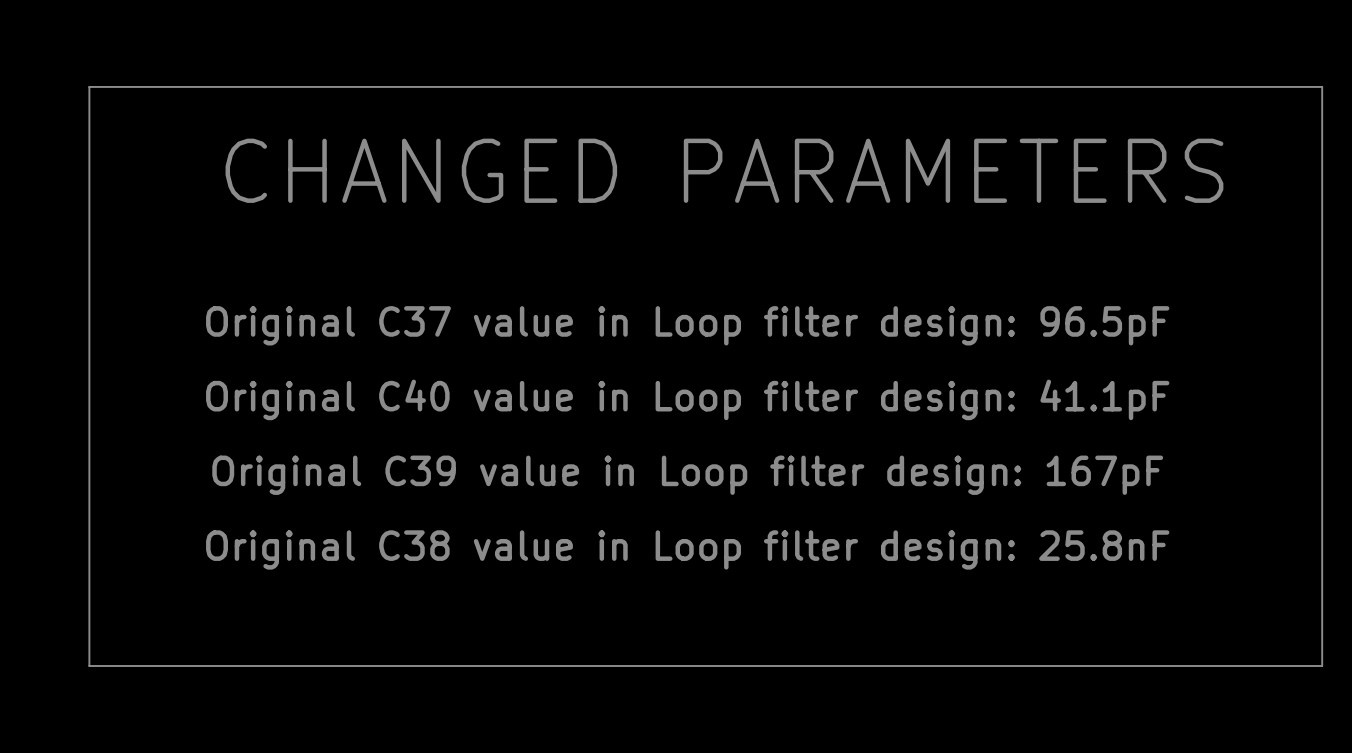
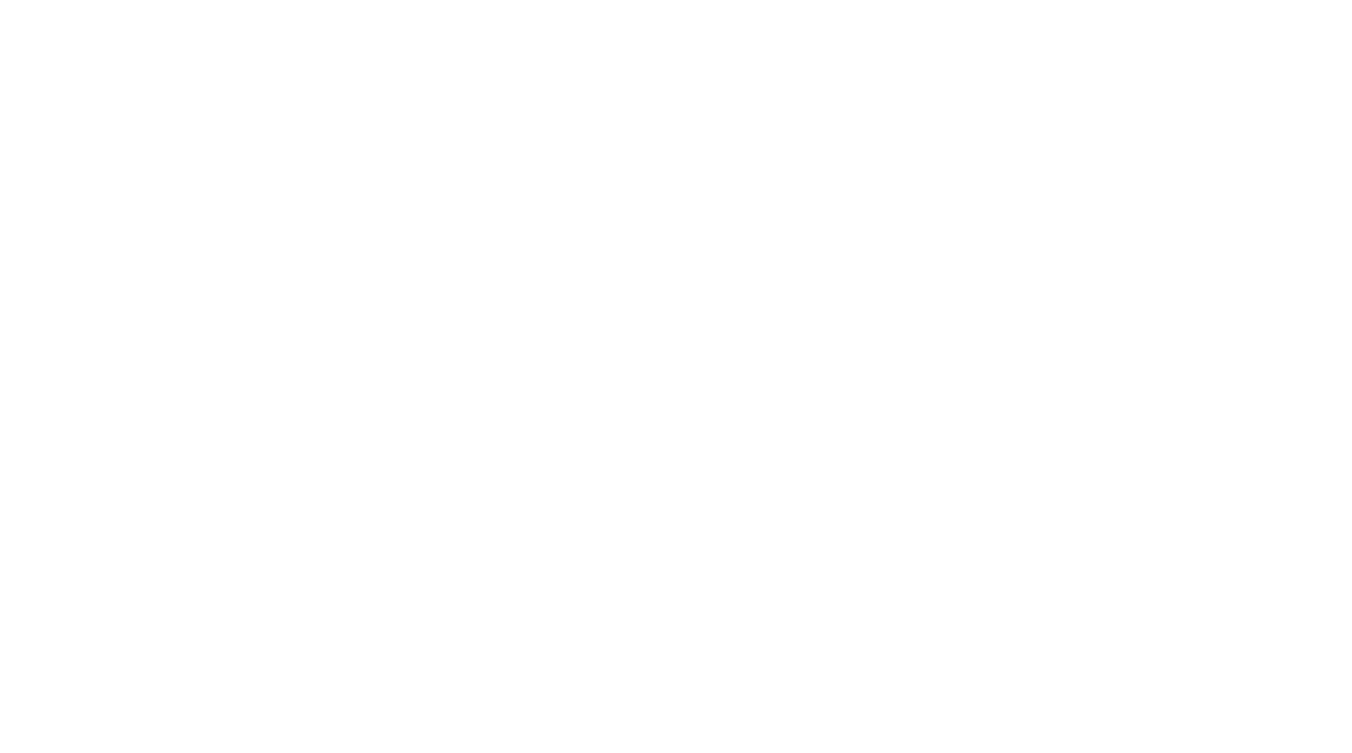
line: (89, 86) (1322, 86) (1322, 666) (89, 666) (89, 86) -> none
text: CHANGED PARAMETERS (724, 170) -> none
text: Original C37 value in Loop filter design: 96.5pF (687, 325) -> none
text: Original C40 value in Loop filter design: 41.1pF (687, 399) -> none
text: Original C39 value in Loop filter design: 167pF (687, 475) -> none
text: Original C38 value in Loop filter design: 25.8nF (687, 549) -> none

